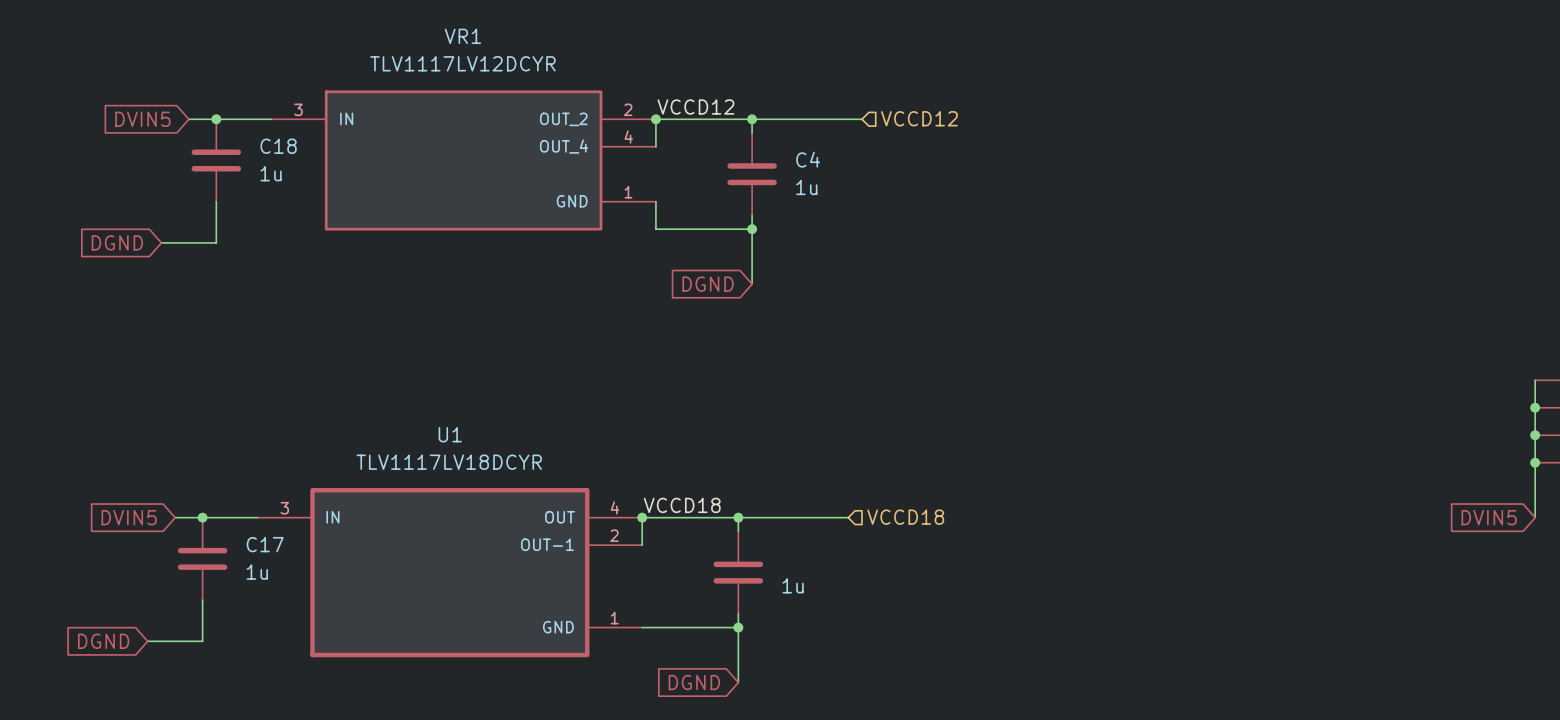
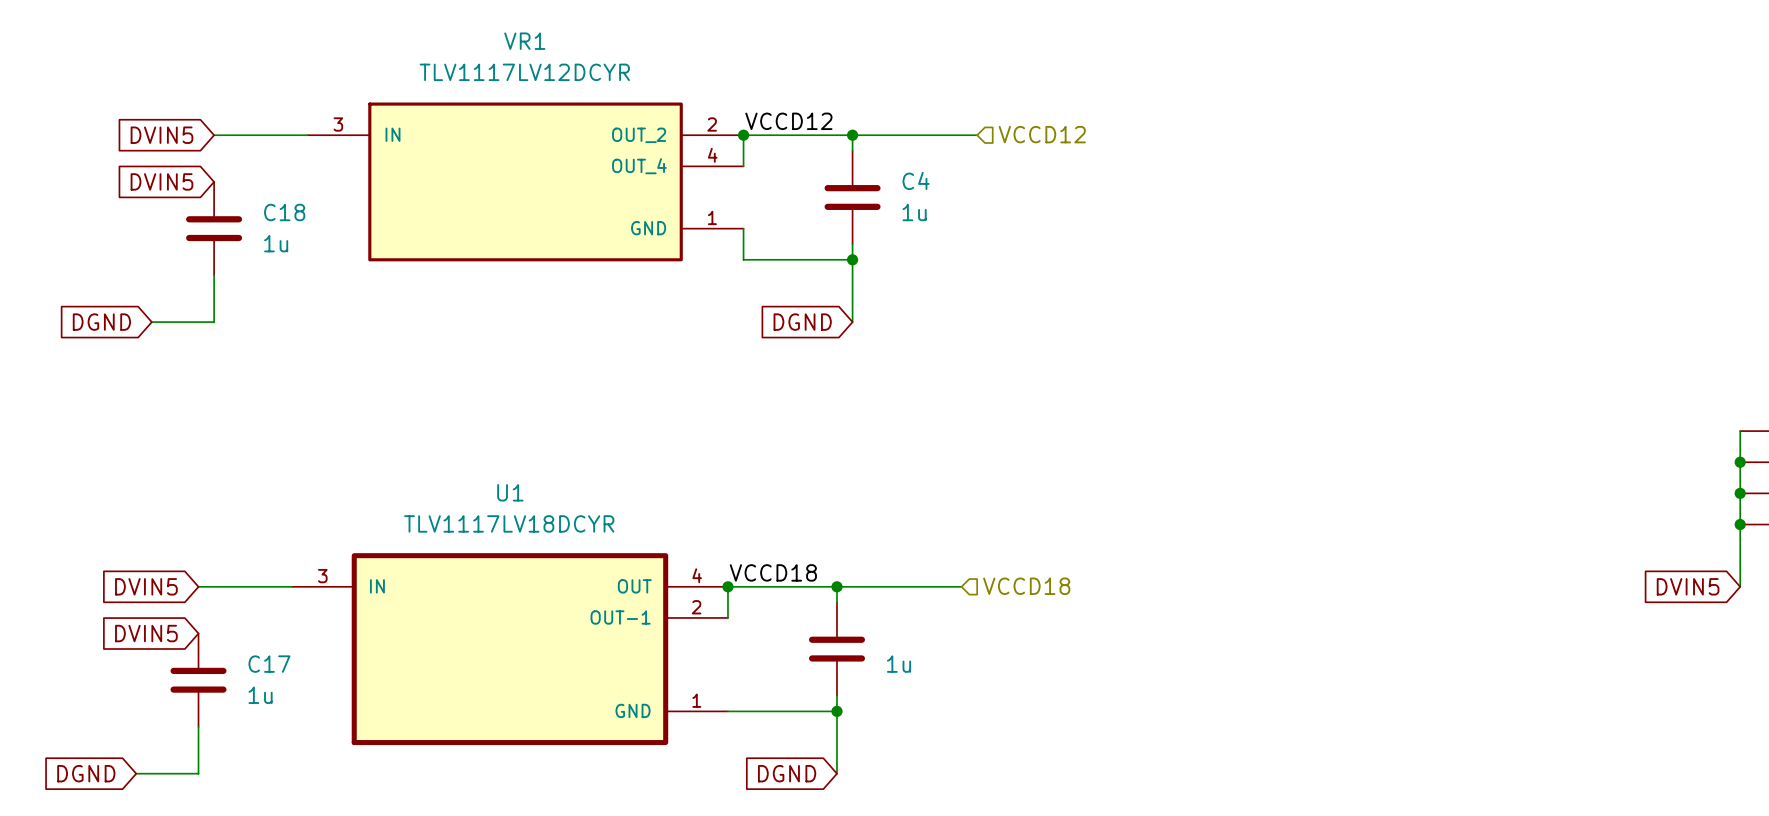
junction: (216, 119) -> none
global label: none -> DVIN5 (161, 181)
C18 position: (216, 160) -> (214, 228)
wire: (216, 201) (216, 242) (161, 242) -> (214, 275) (214, 322) (151, 322)
global label position: DGND (117, 242) -> DGND (101, 322)
junction: (202, 517) -> none
global label: none -> DVIN5 (146, 633)
C17 position: (202, 558) -> (198, 680)
wire: (202, 600) (202, 641) (147, 641) -> (198, 726) (198, 773) (136, 773)
global label position: DGND (103, 641) -> DGND (86, 773)

